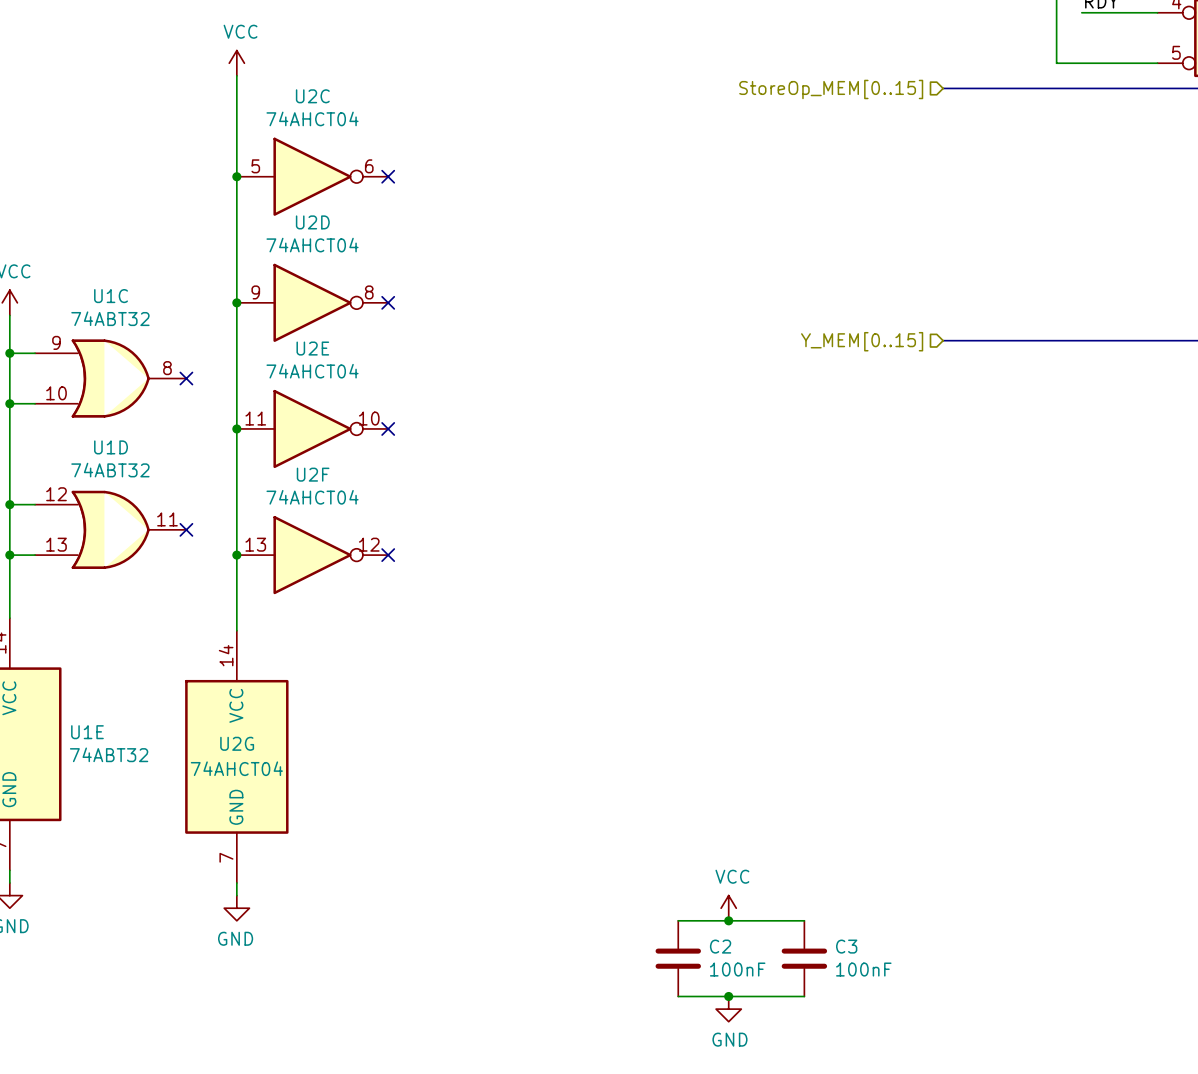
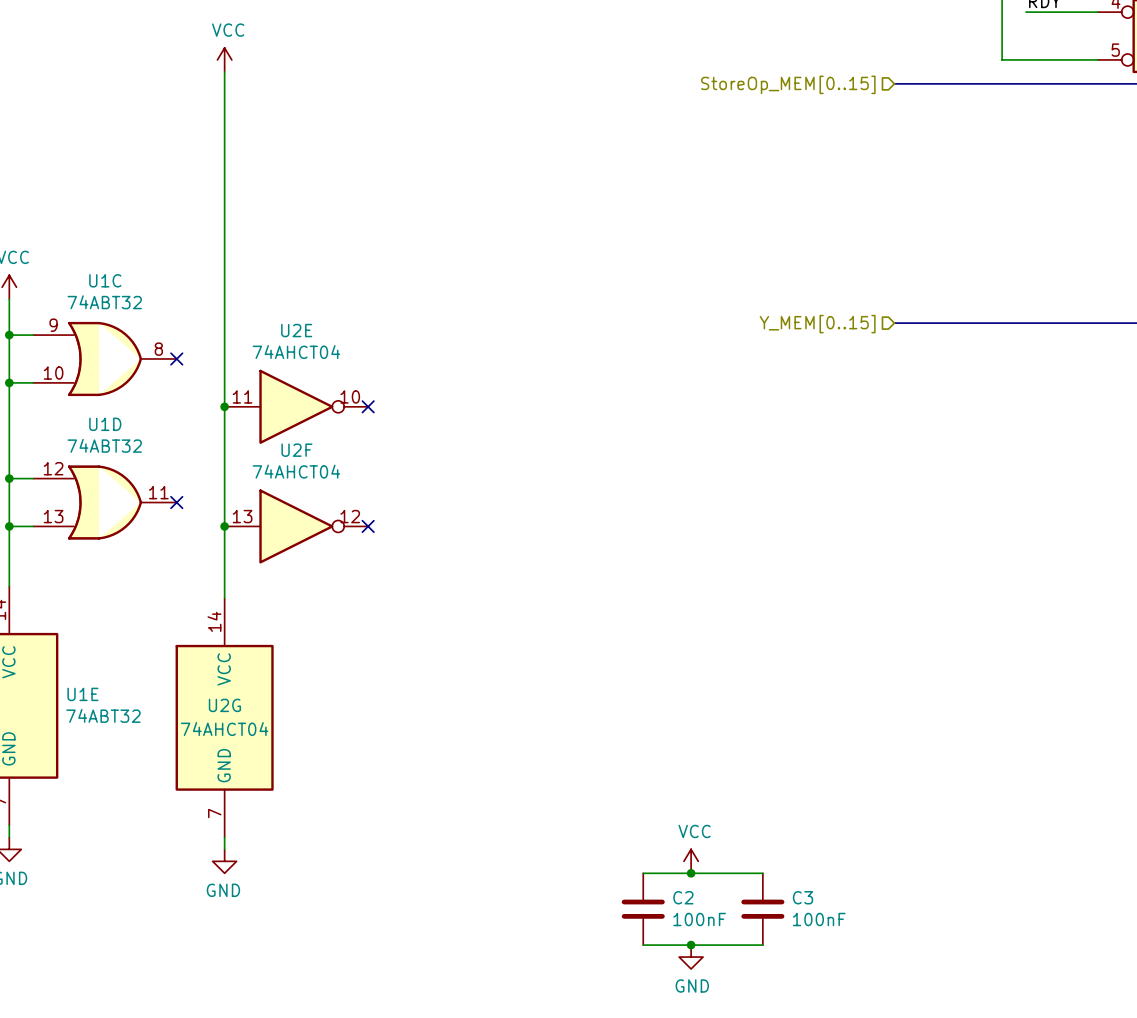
junction: (236, 176) -> none
U2C: 74AHCT04 (312, 176) -> none
no-connect mark: (388, 176) -> none
junction: (236, 302) -> none
U2D: 74AHCT04 (312, 302) -> none
no-connect mark: (388, 302) -> none

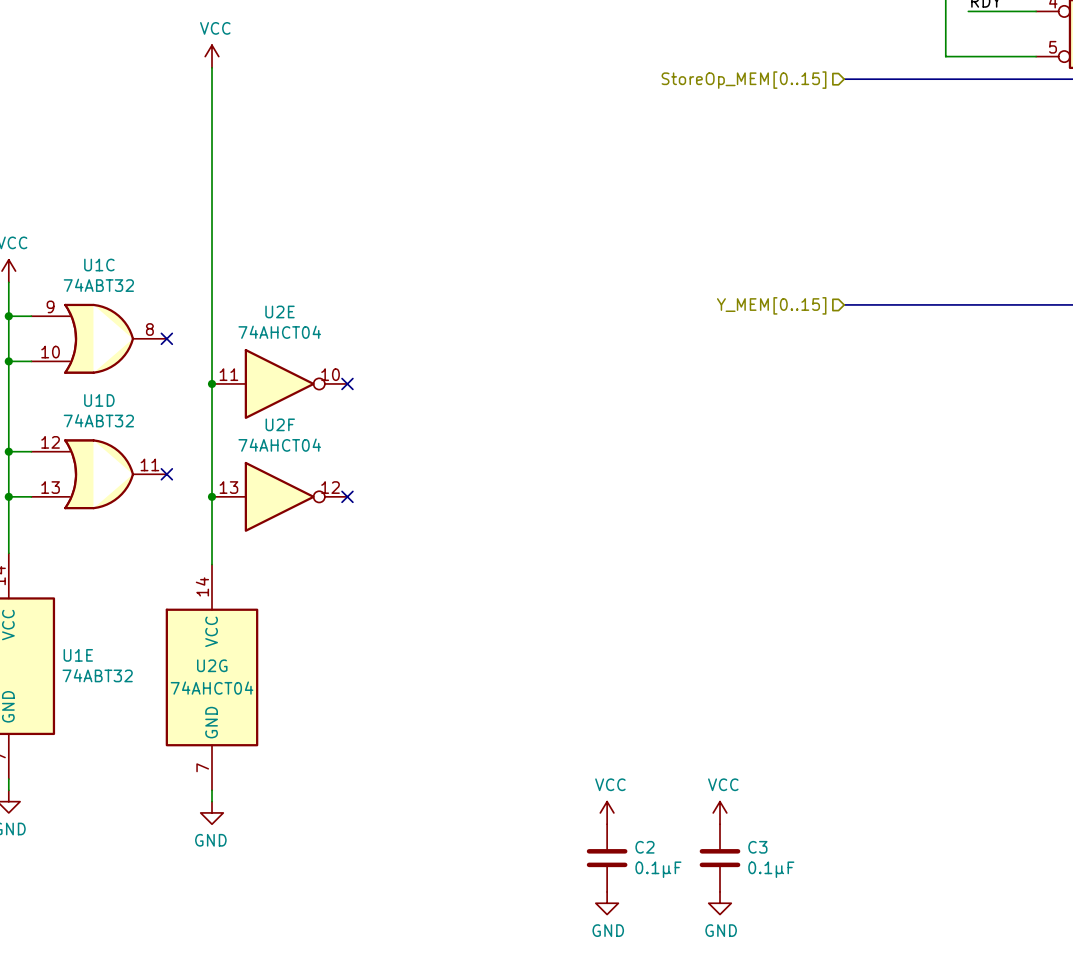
power symbol: none -> VCC (607, 812)
power symbol: VCC (691, 861) -> none
power symbol: none -> VCC (720, 812)
wire: (643, 873) (762, 873) -> none
junction: (691, 873) -> none
C2 value: 100nF (699, 919) -> 0.1μF (658, 869)
C3 value: 100nF (819, 919) -> 0.1μF (771, 869)
wire: (643, 945) (762, 945) -> none
junction: (691, 945) -> none
power symbol: none -> GND (607, 903)
power symbol: GND (691, 957) -> none
power symbol: none -> GND (720, 903)

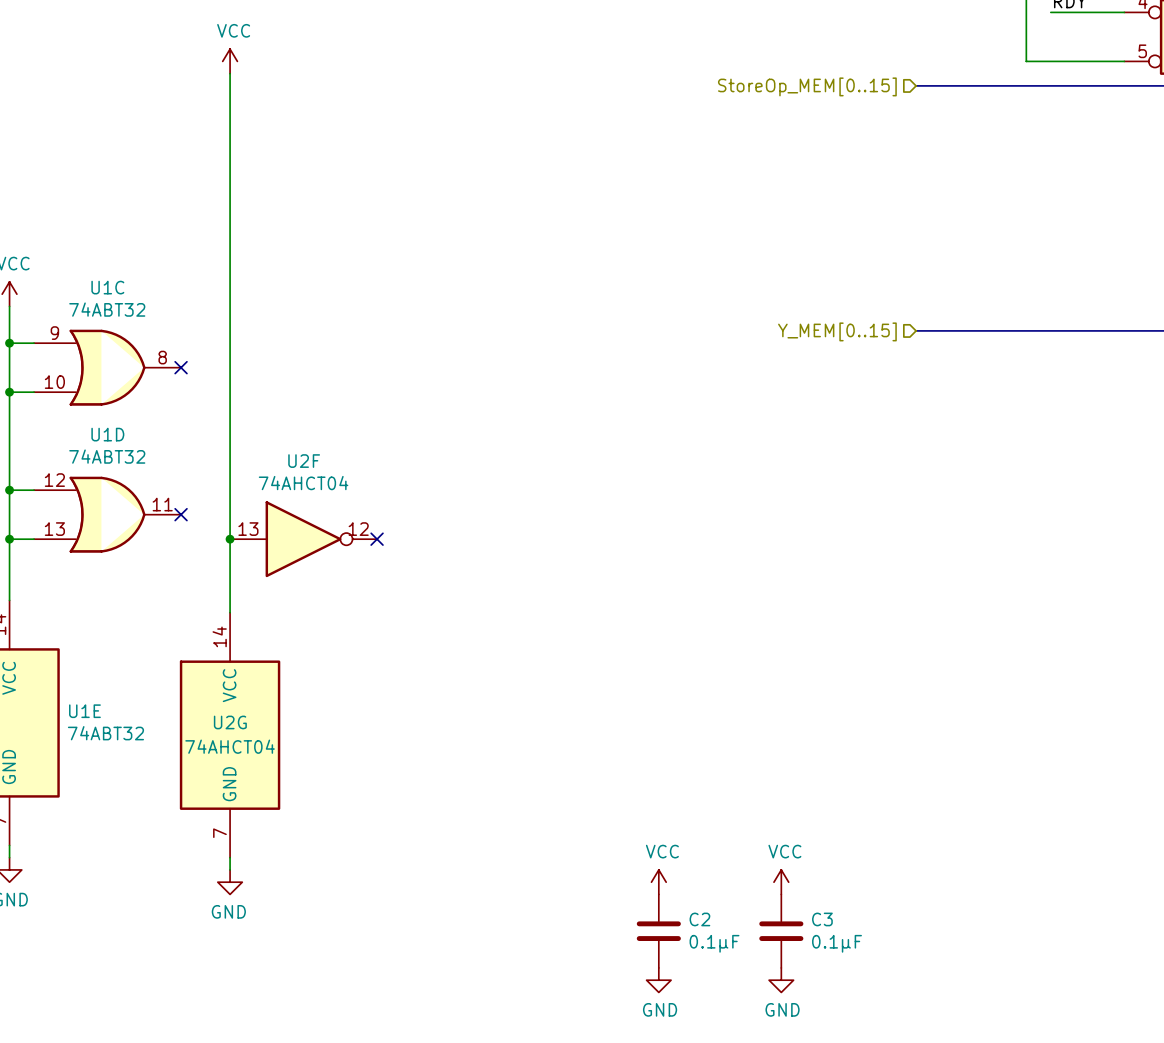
junction: (212, 383) -> none
U2E: 74AHCT04 (279, 383) -> none
no-connect mark: (347, 383) -> none

